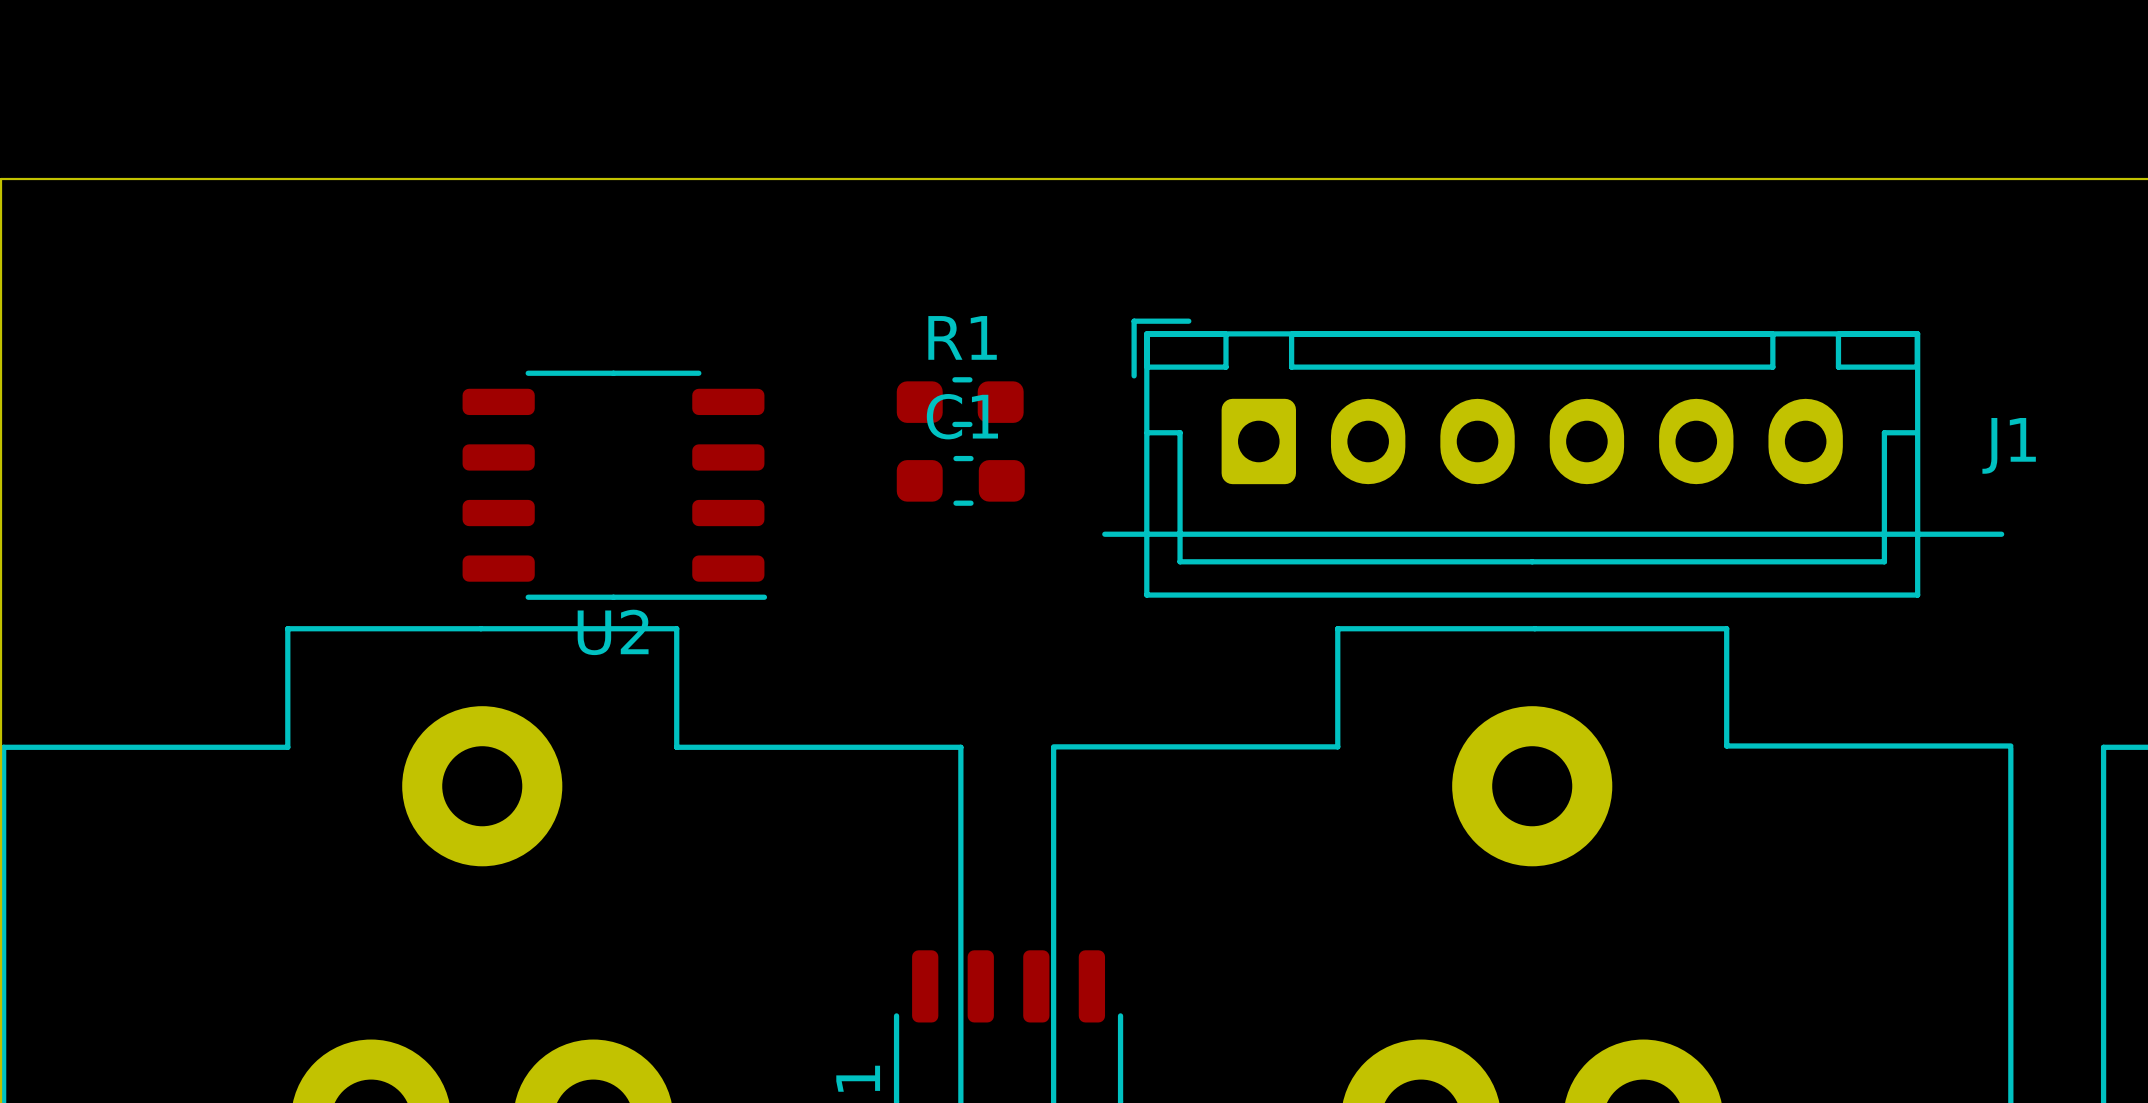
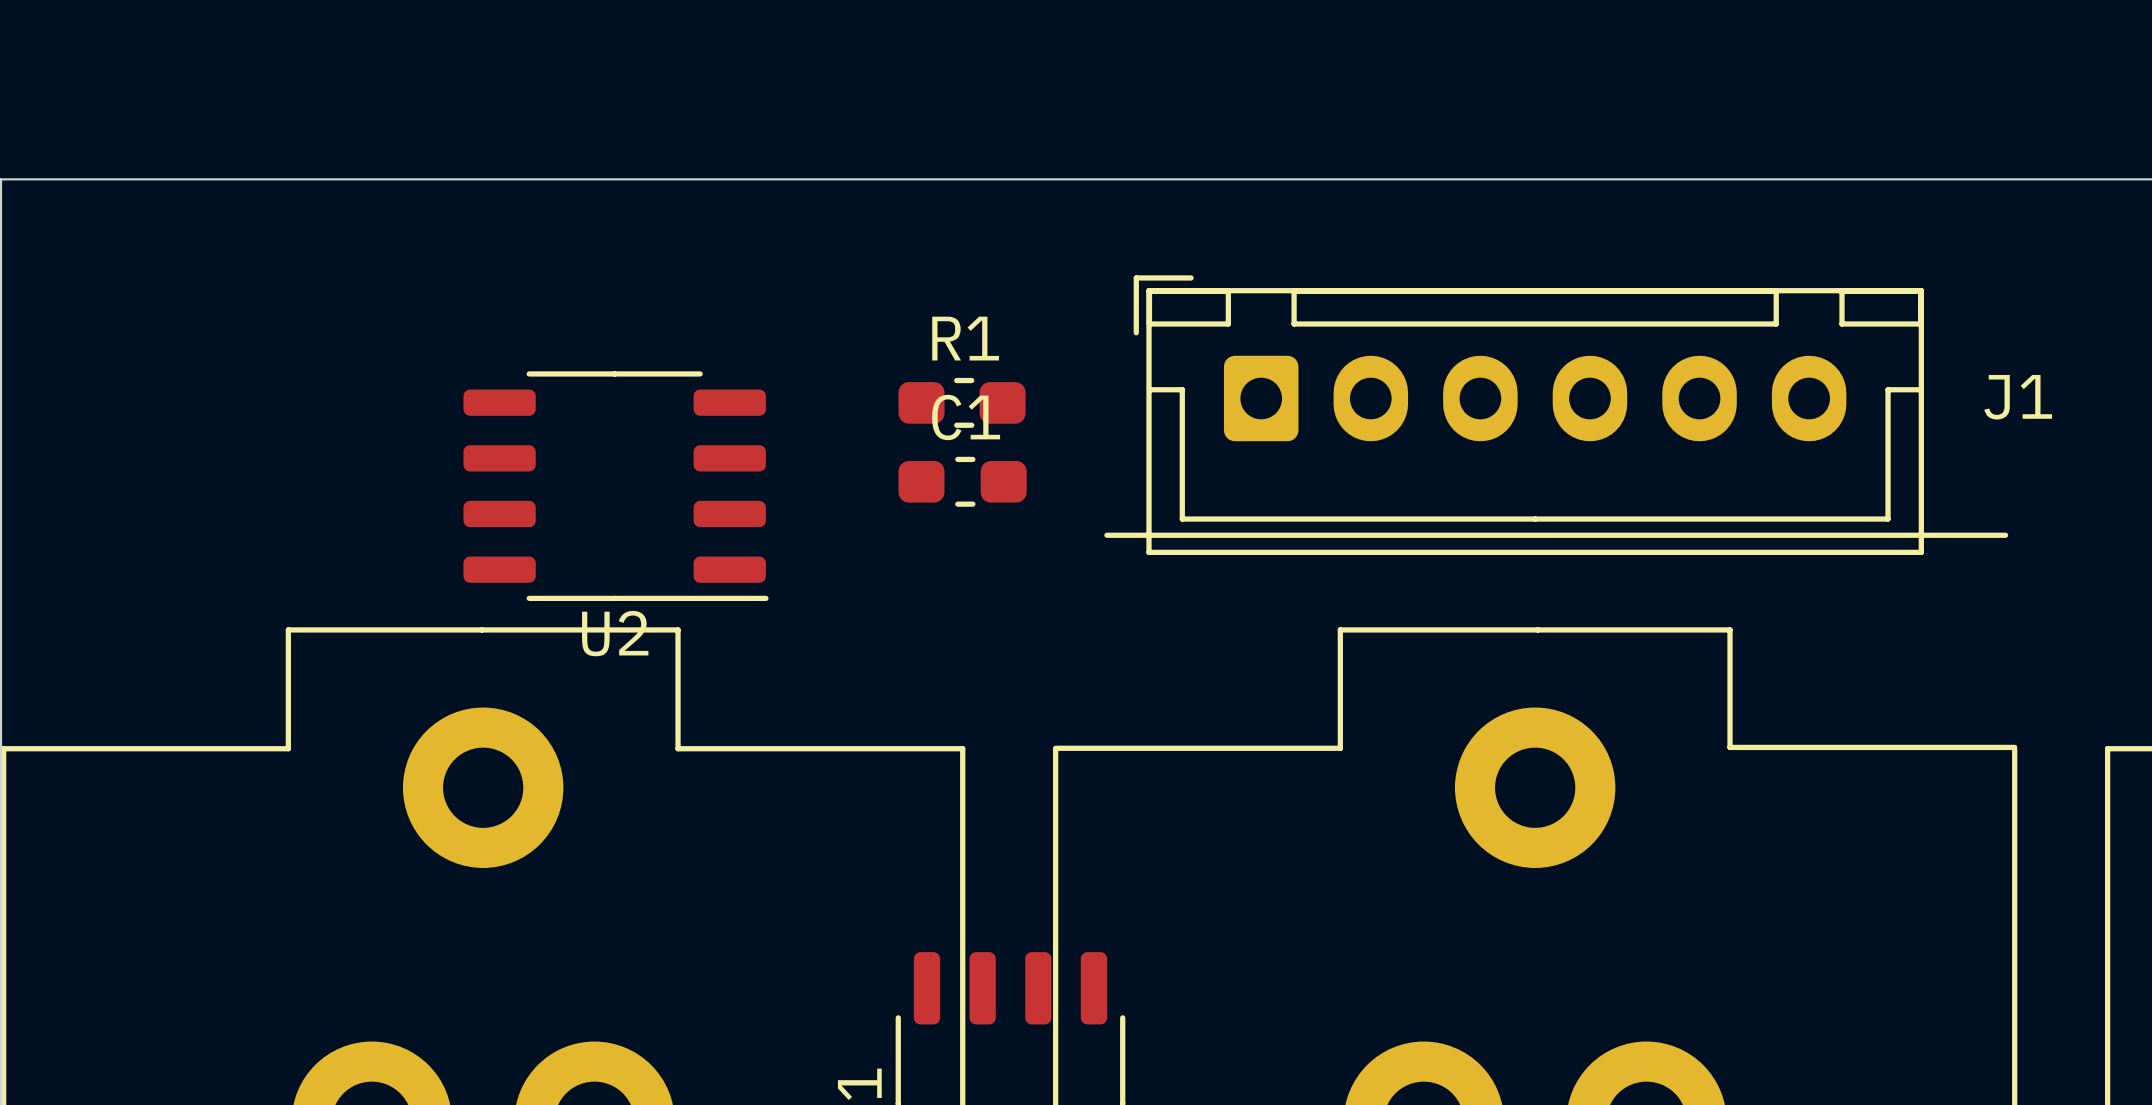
J1 position: (1525, 458) -> (1528, 415)

